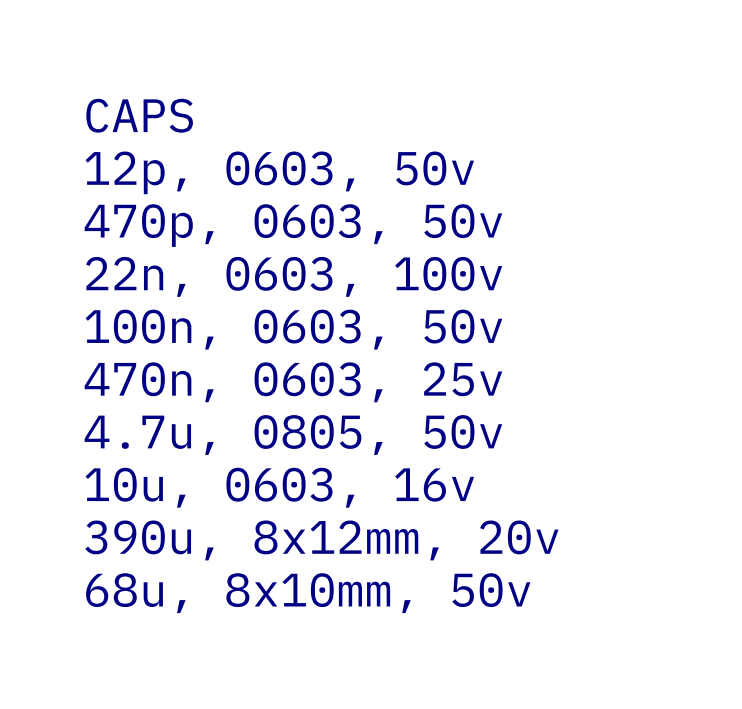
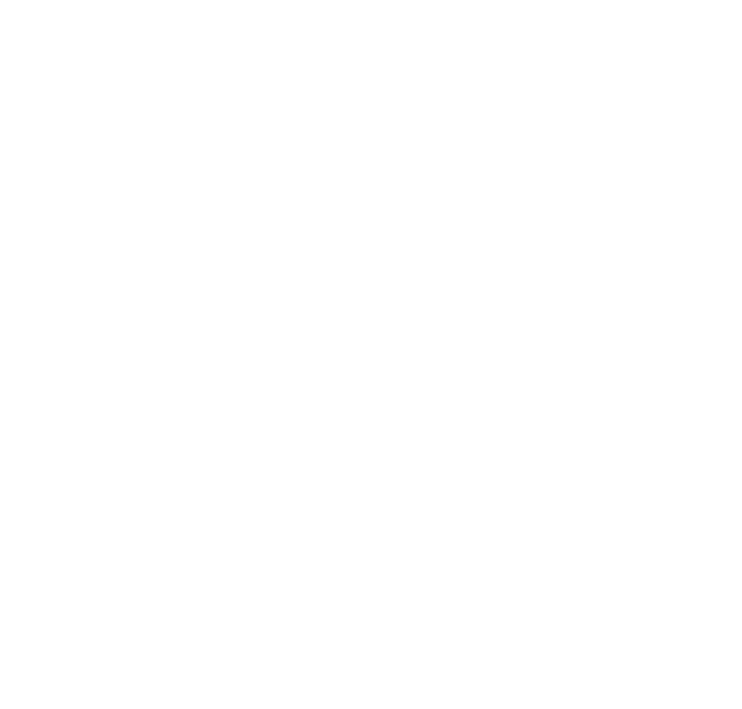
text: CAPS (139, 115) -> none
text: 12p, 0603, 50v (279, 172) -> none
text: 470p, 0603, 50v (293, 225) -> none
text: 22n, 0603, 100v (294, 276) -> none
text: 100n, 0603, 50v (293, 329) -> none
text: 470n, 0603, 25v (293, 382) -> none
text: 4.7u, 0805, 50v (293, 435) -> none
text: 10u, 0603, 16v (279, 487) -> none
text: 390u, 8x12mm, 20v (321, 540) -> none
text: 68u, 8x10mm, 50v (308, 593) -> none

